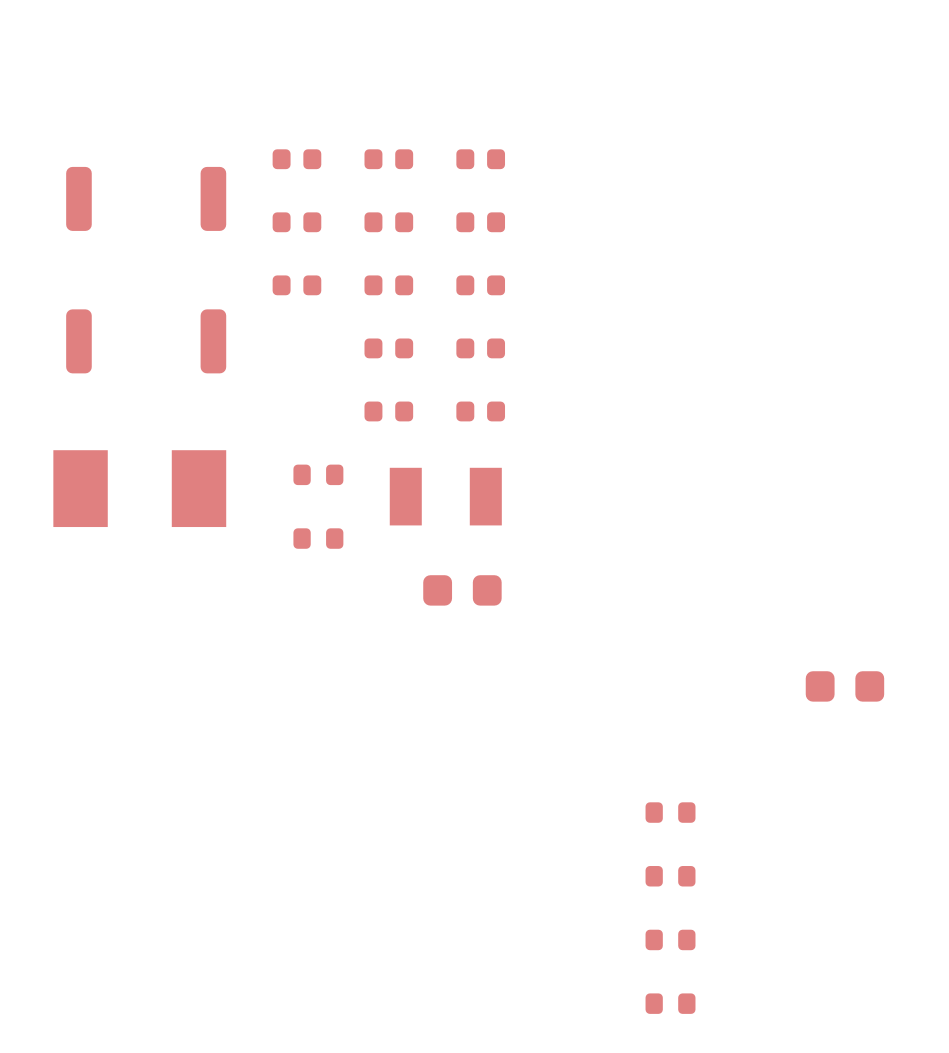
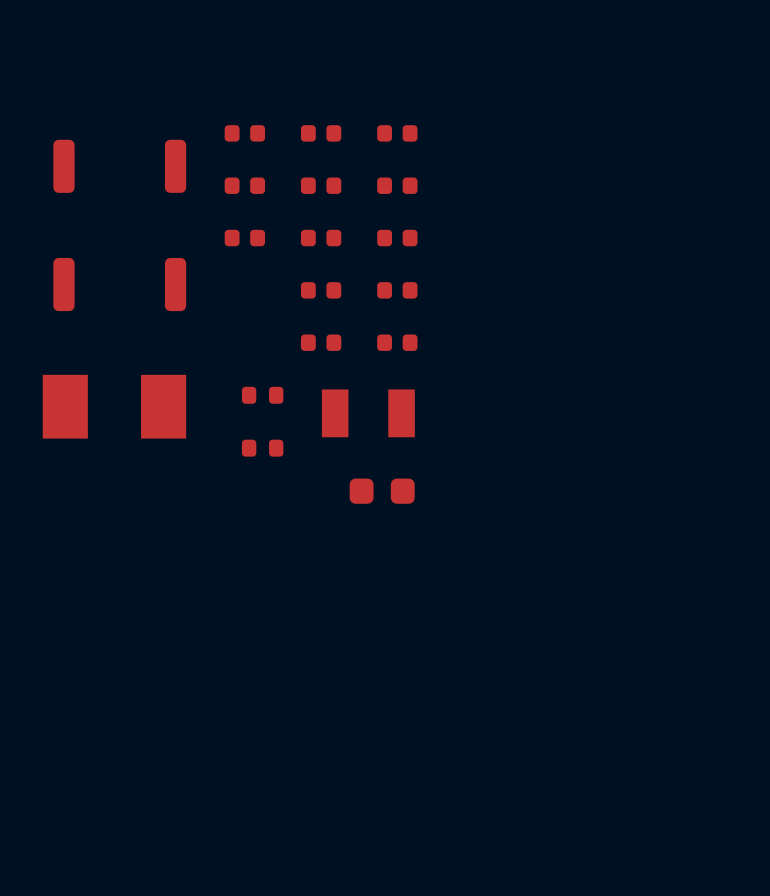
part: (844, 686) -> none
part: (670, 812) -> none
part: (670, 876) -> none
part: (670, 939) -> none
part: (670, 1003) -> none

